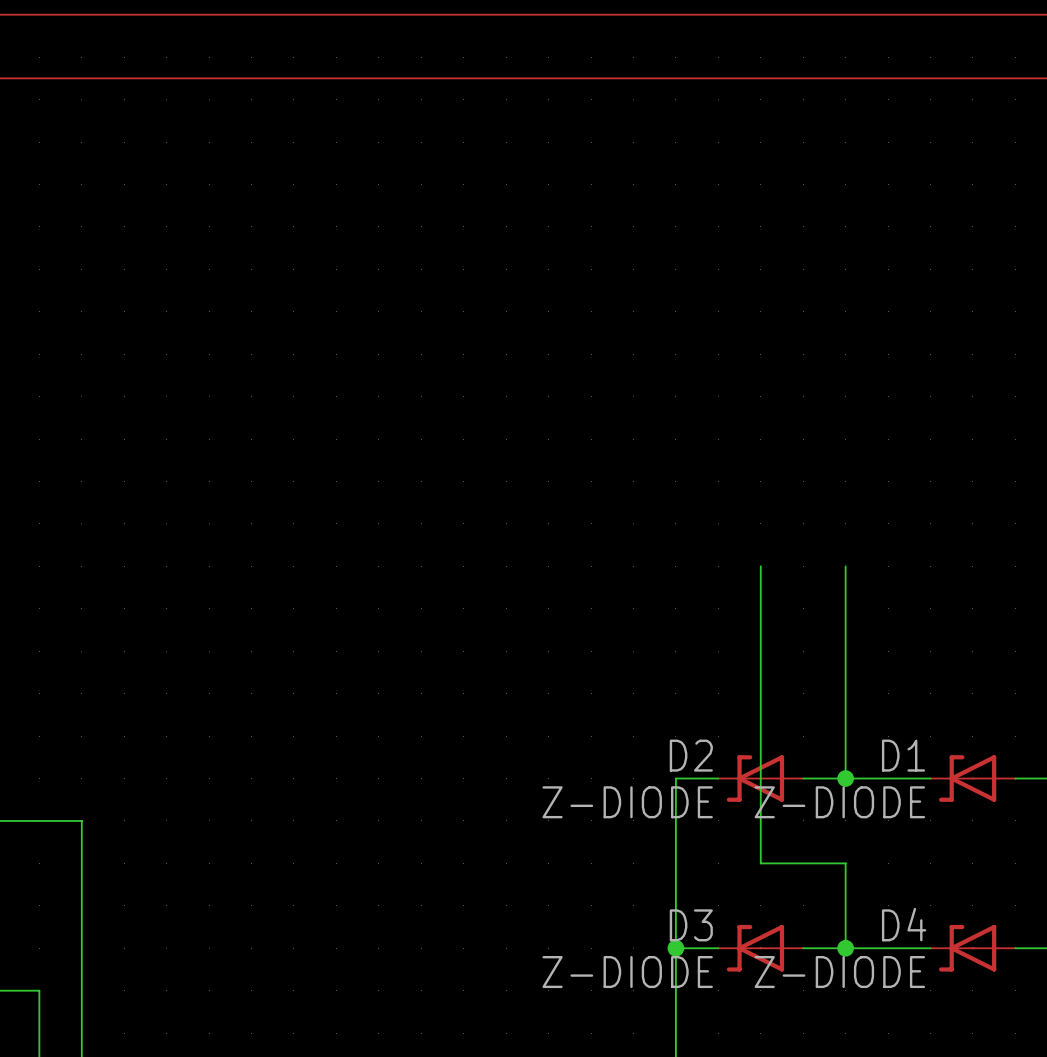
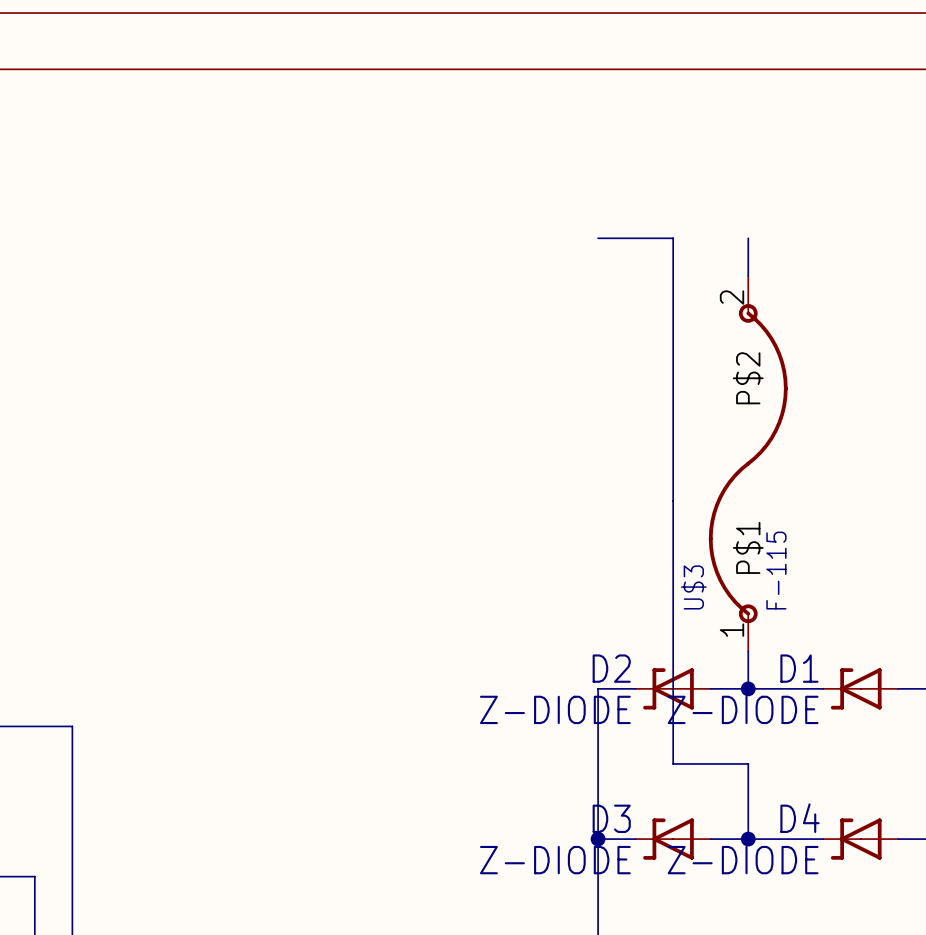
wire: none -> (598, 238) (673, 238) (673, 501)
wire: none -> (748, 238) (748, 275)
U$3: none -> F-115 (748, 463)
wire: (845, 566) (845, 736) -> none

